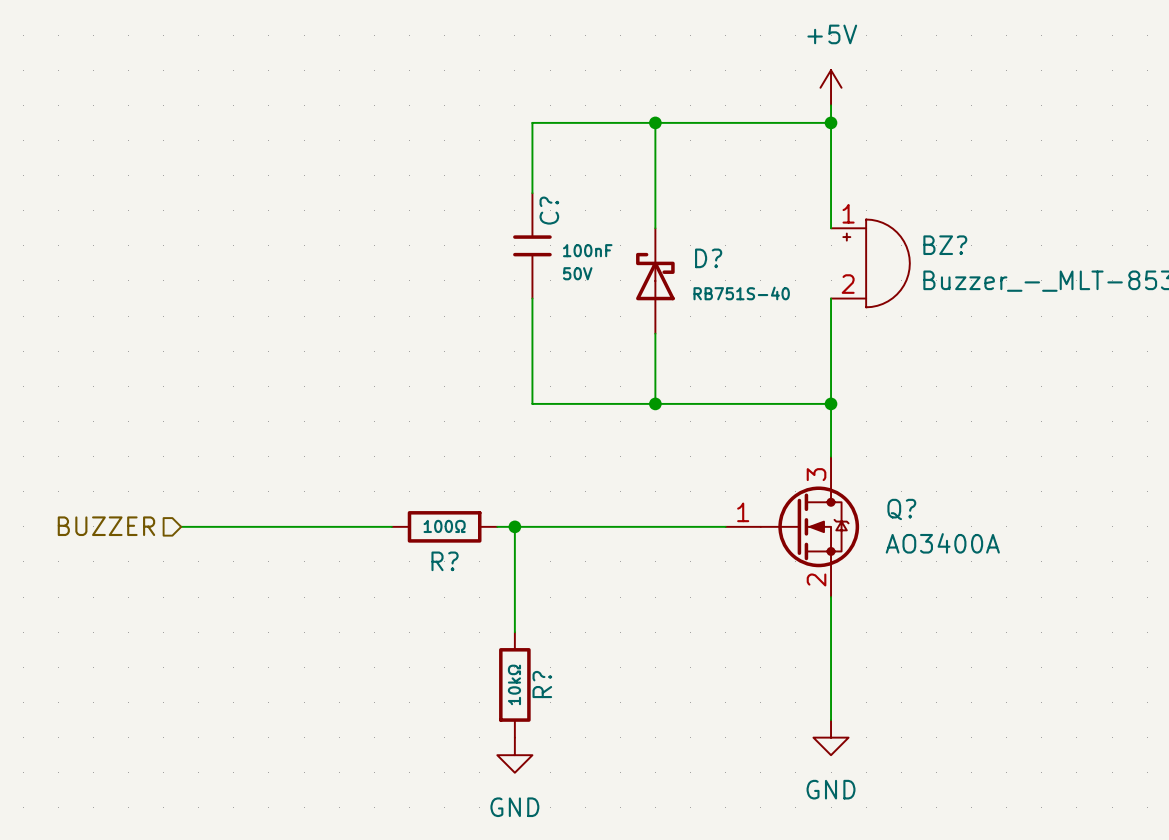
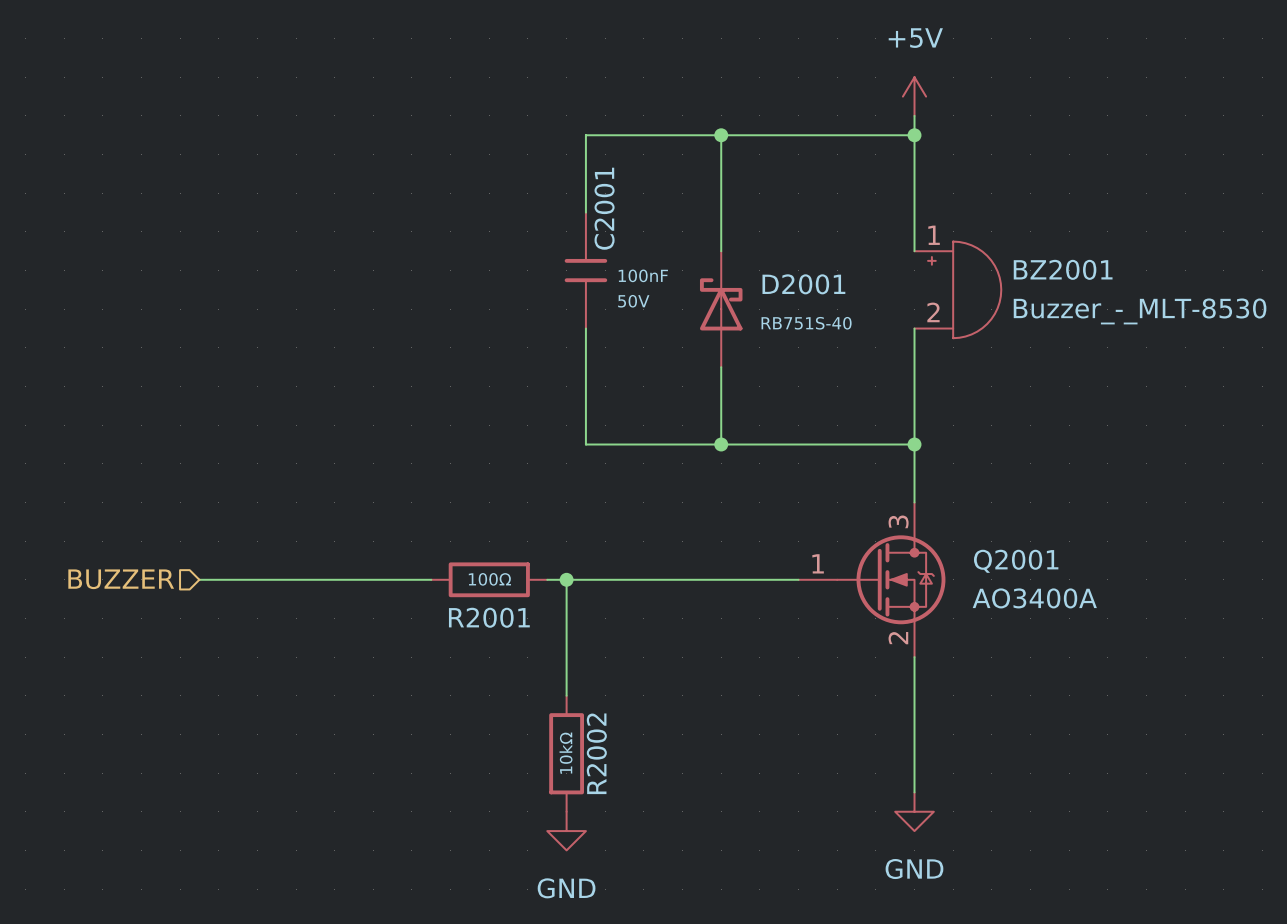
C? name: C? (549, 210) -> C2001 (604, 208)
BZ? name: BZ? (945, 245) -> BZ2001 (1063, 269)
D? name: D? (708, 258) -> D2001 (803, 284)
Q? name: Q? (901, 509) -> Q2001 (1016, 561)
R? name: R? (445, 561) -> R2001 (489, 617)
R? name: R? (542, 684) -> R2002 (596, 753)

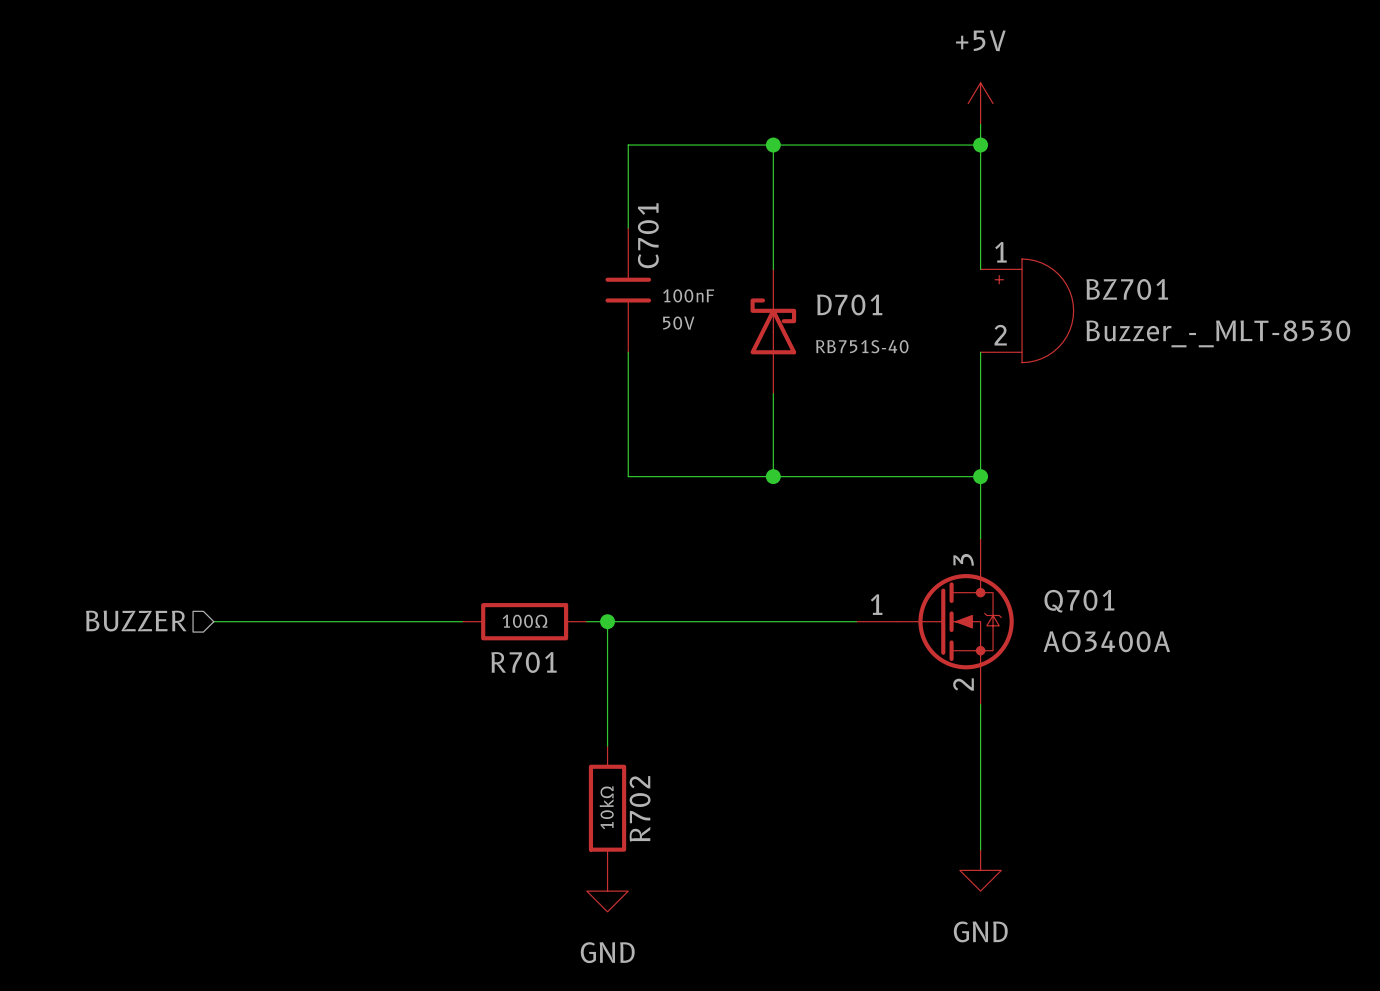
C2001 name: C2001 (604, 208) -> C701 (648, 235)
BZ2001 name: BZ2001 (1063, 269) -> BZ701 (1127, 289)
D2001 name: D2001 (803, 284) -> D701 (849, 304)
Q2001 name: Q2001 (1016, 561) -> Q701 (1079, 601)
R2001 name: R2001 (489, 617) -> R701 (524, 662)
R2002 name: R2002 (596, 753) -> R702 (640, 808)

